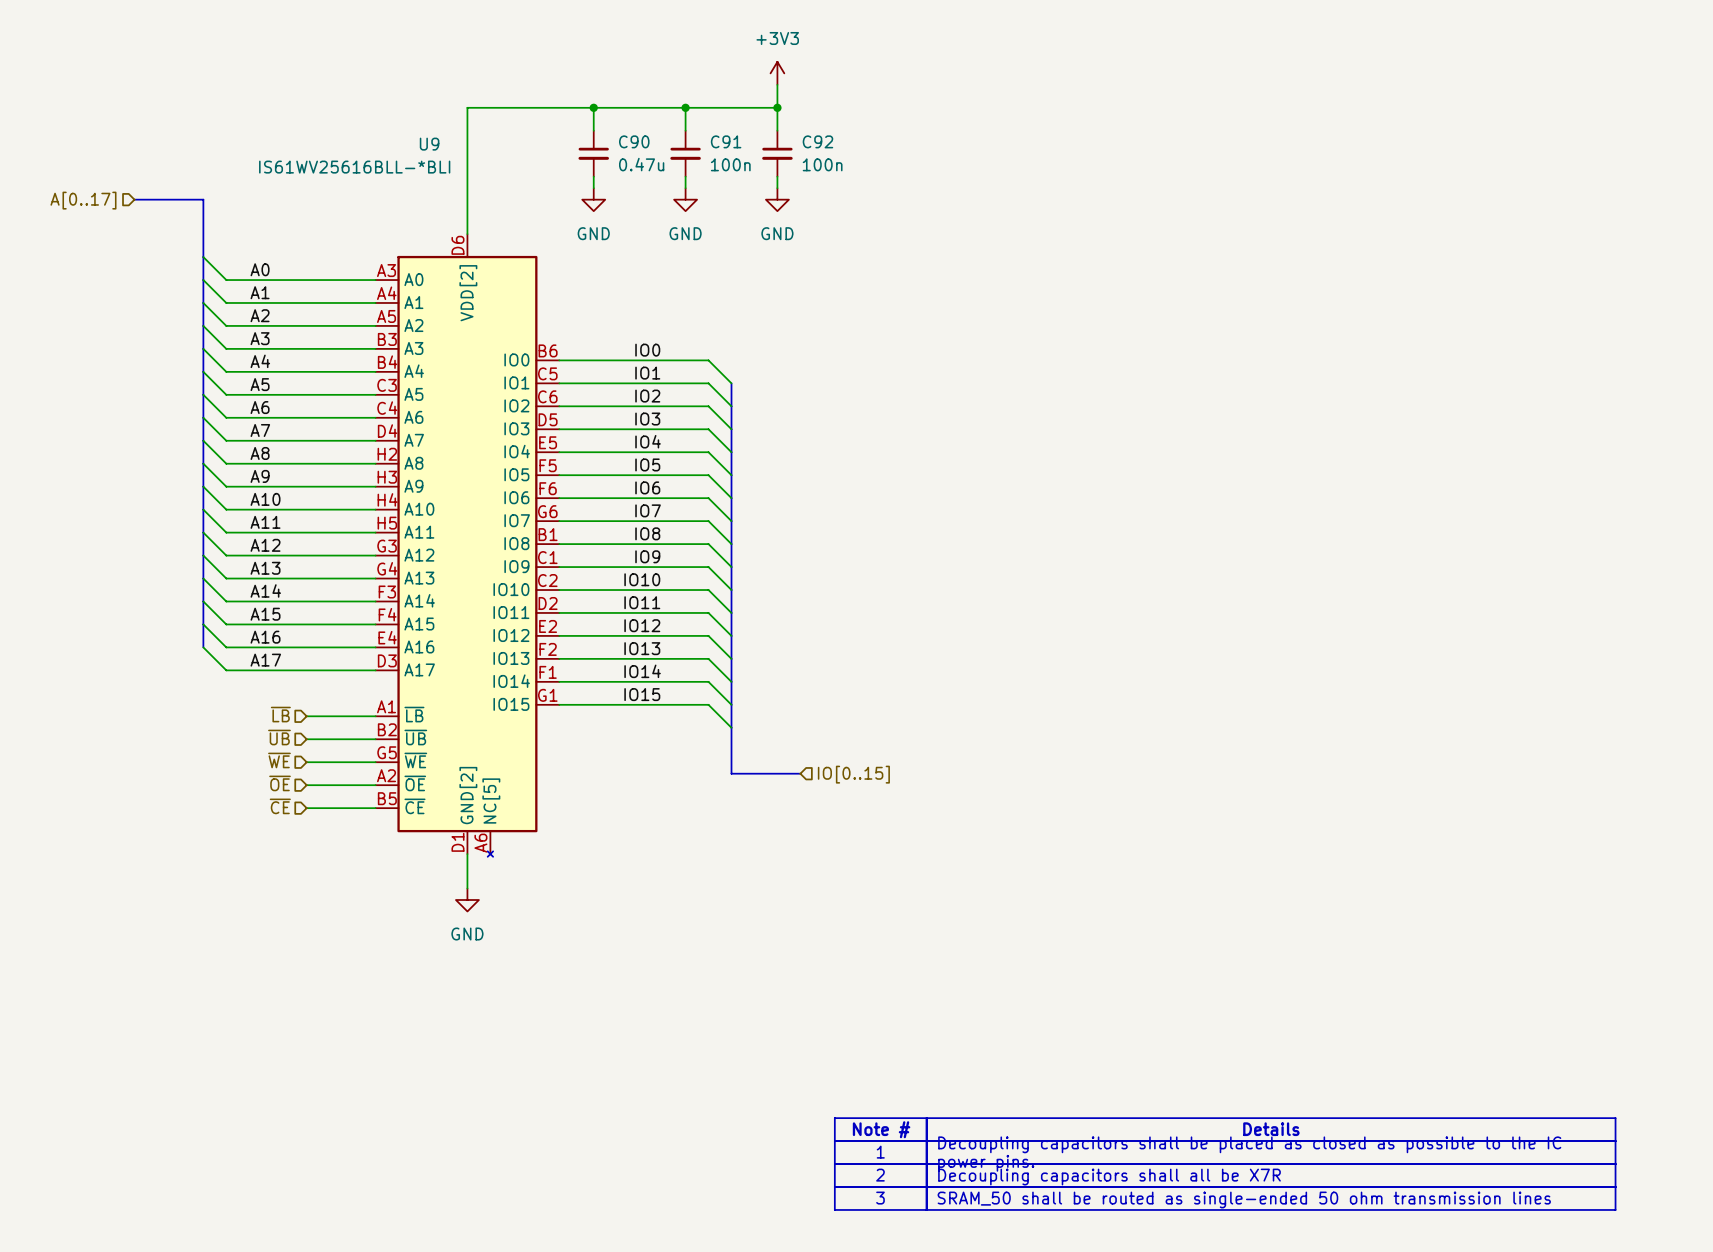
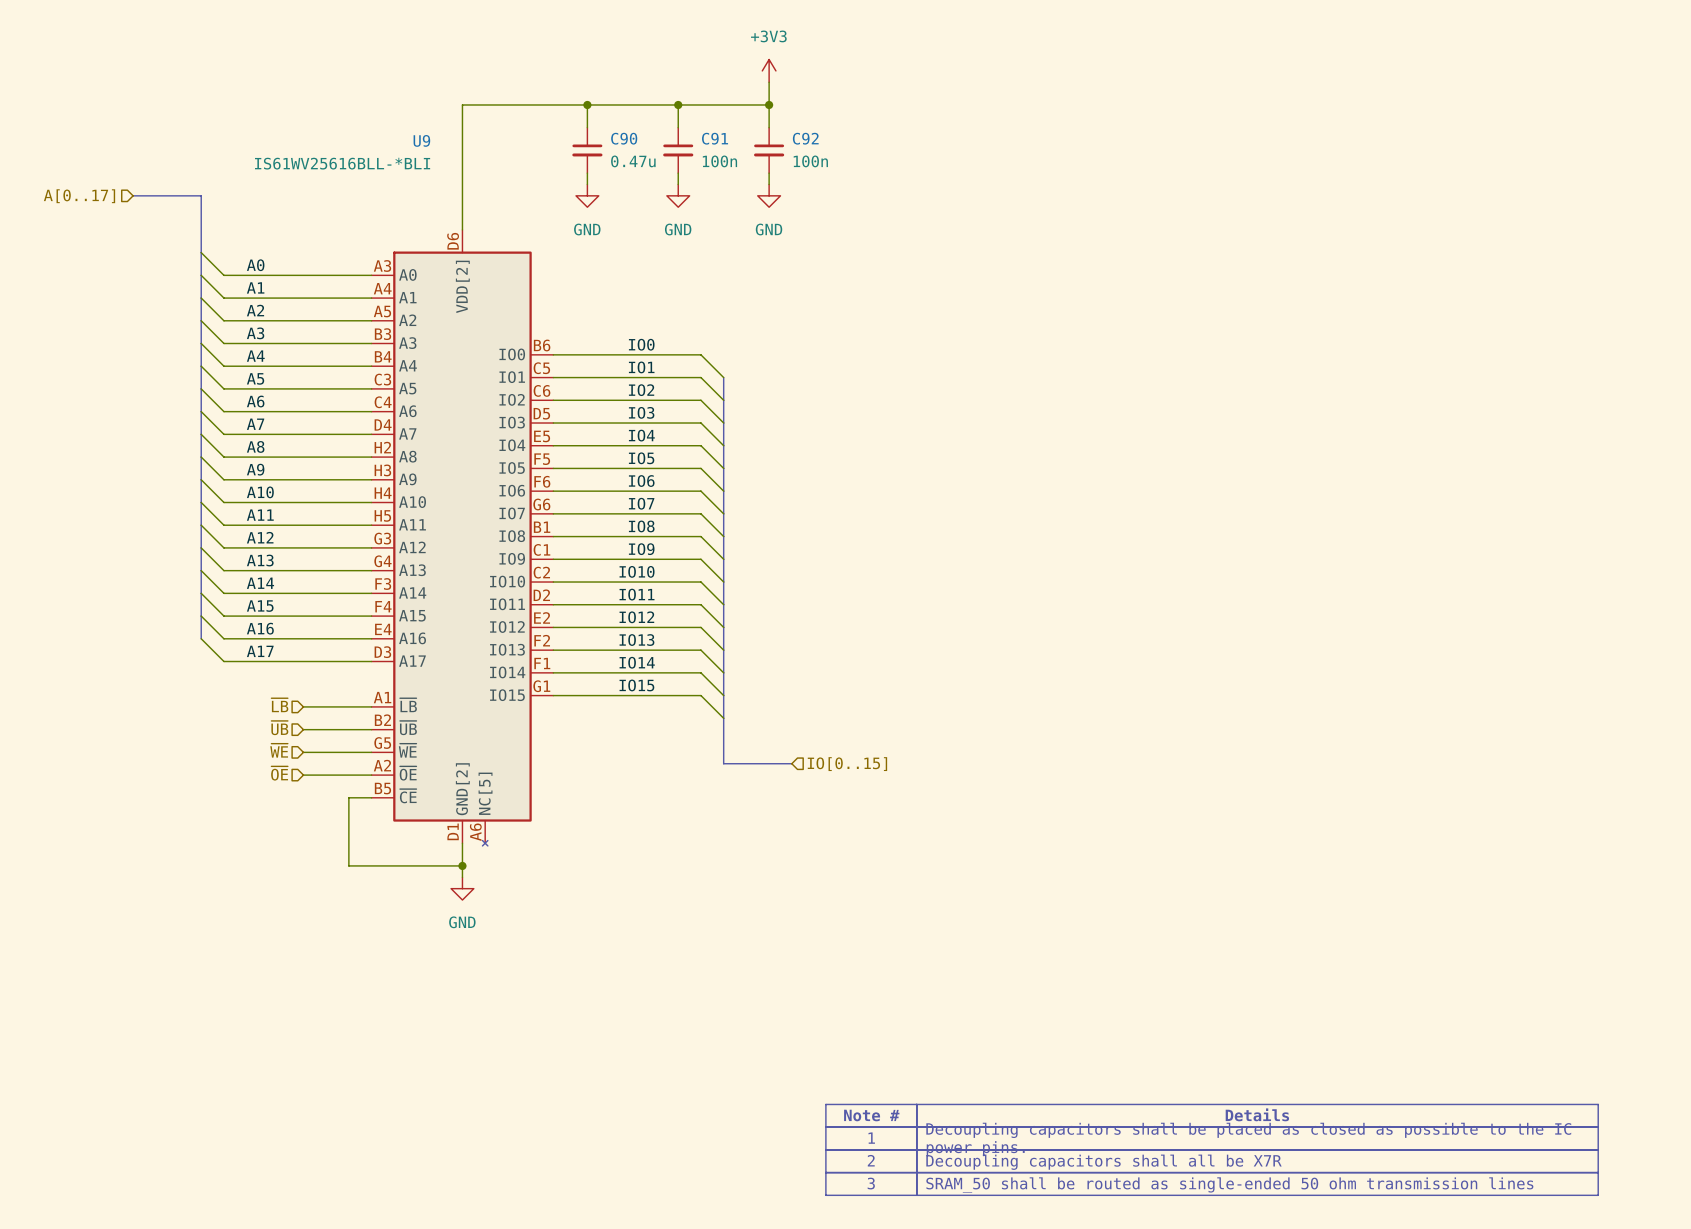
hierarchical label: ~{CE} (280, 806) -> none
wire: (306, 808) (352, 808) -> (462, 865) (348, 865) (348, 797)
junction: none -> (462, 865)

